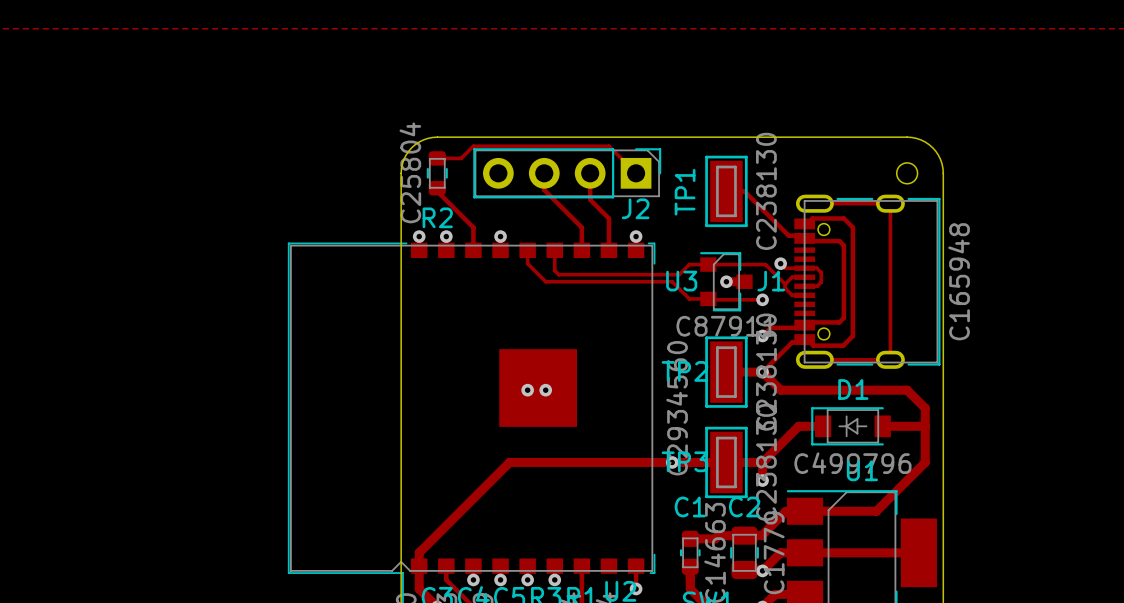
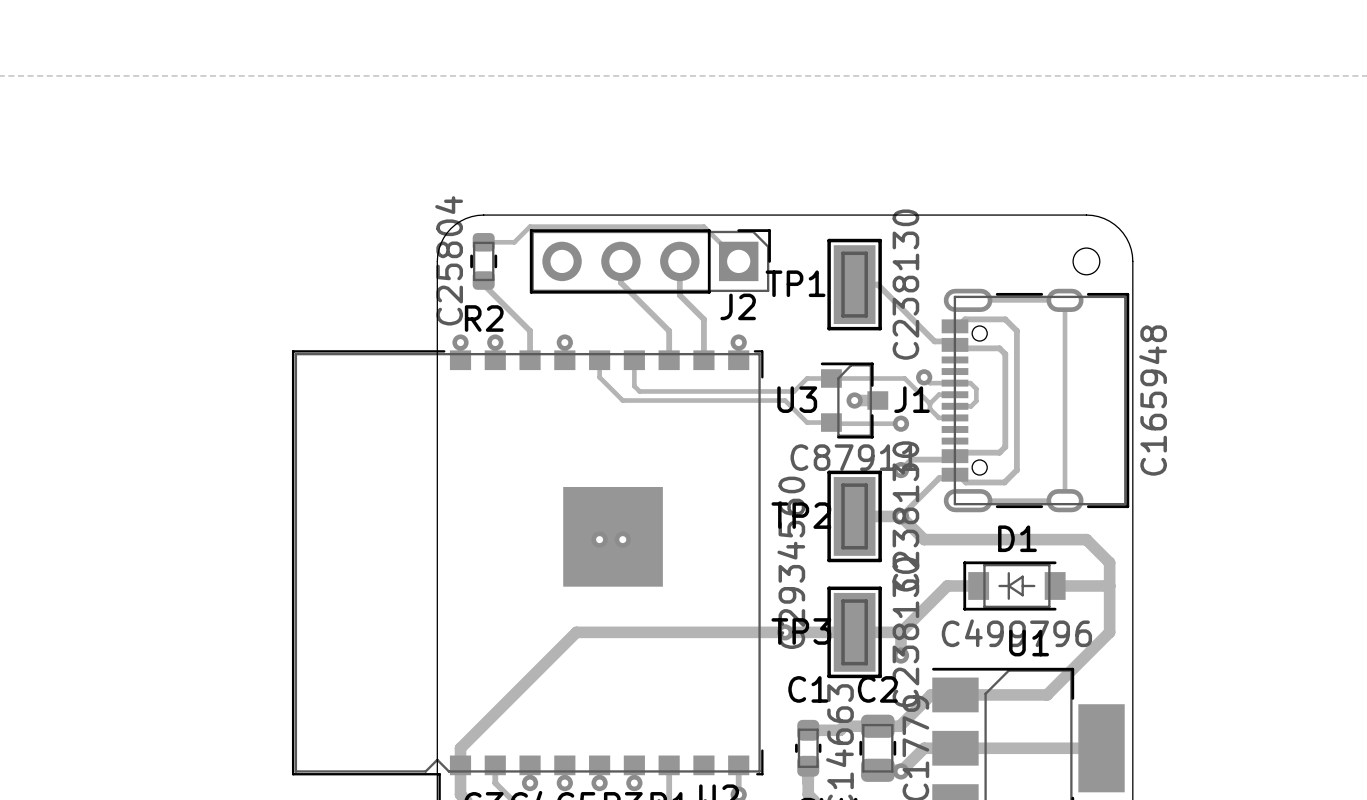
TP1 name rotation: 0° (685, 192) -> 90° clockwise (795, 283)

